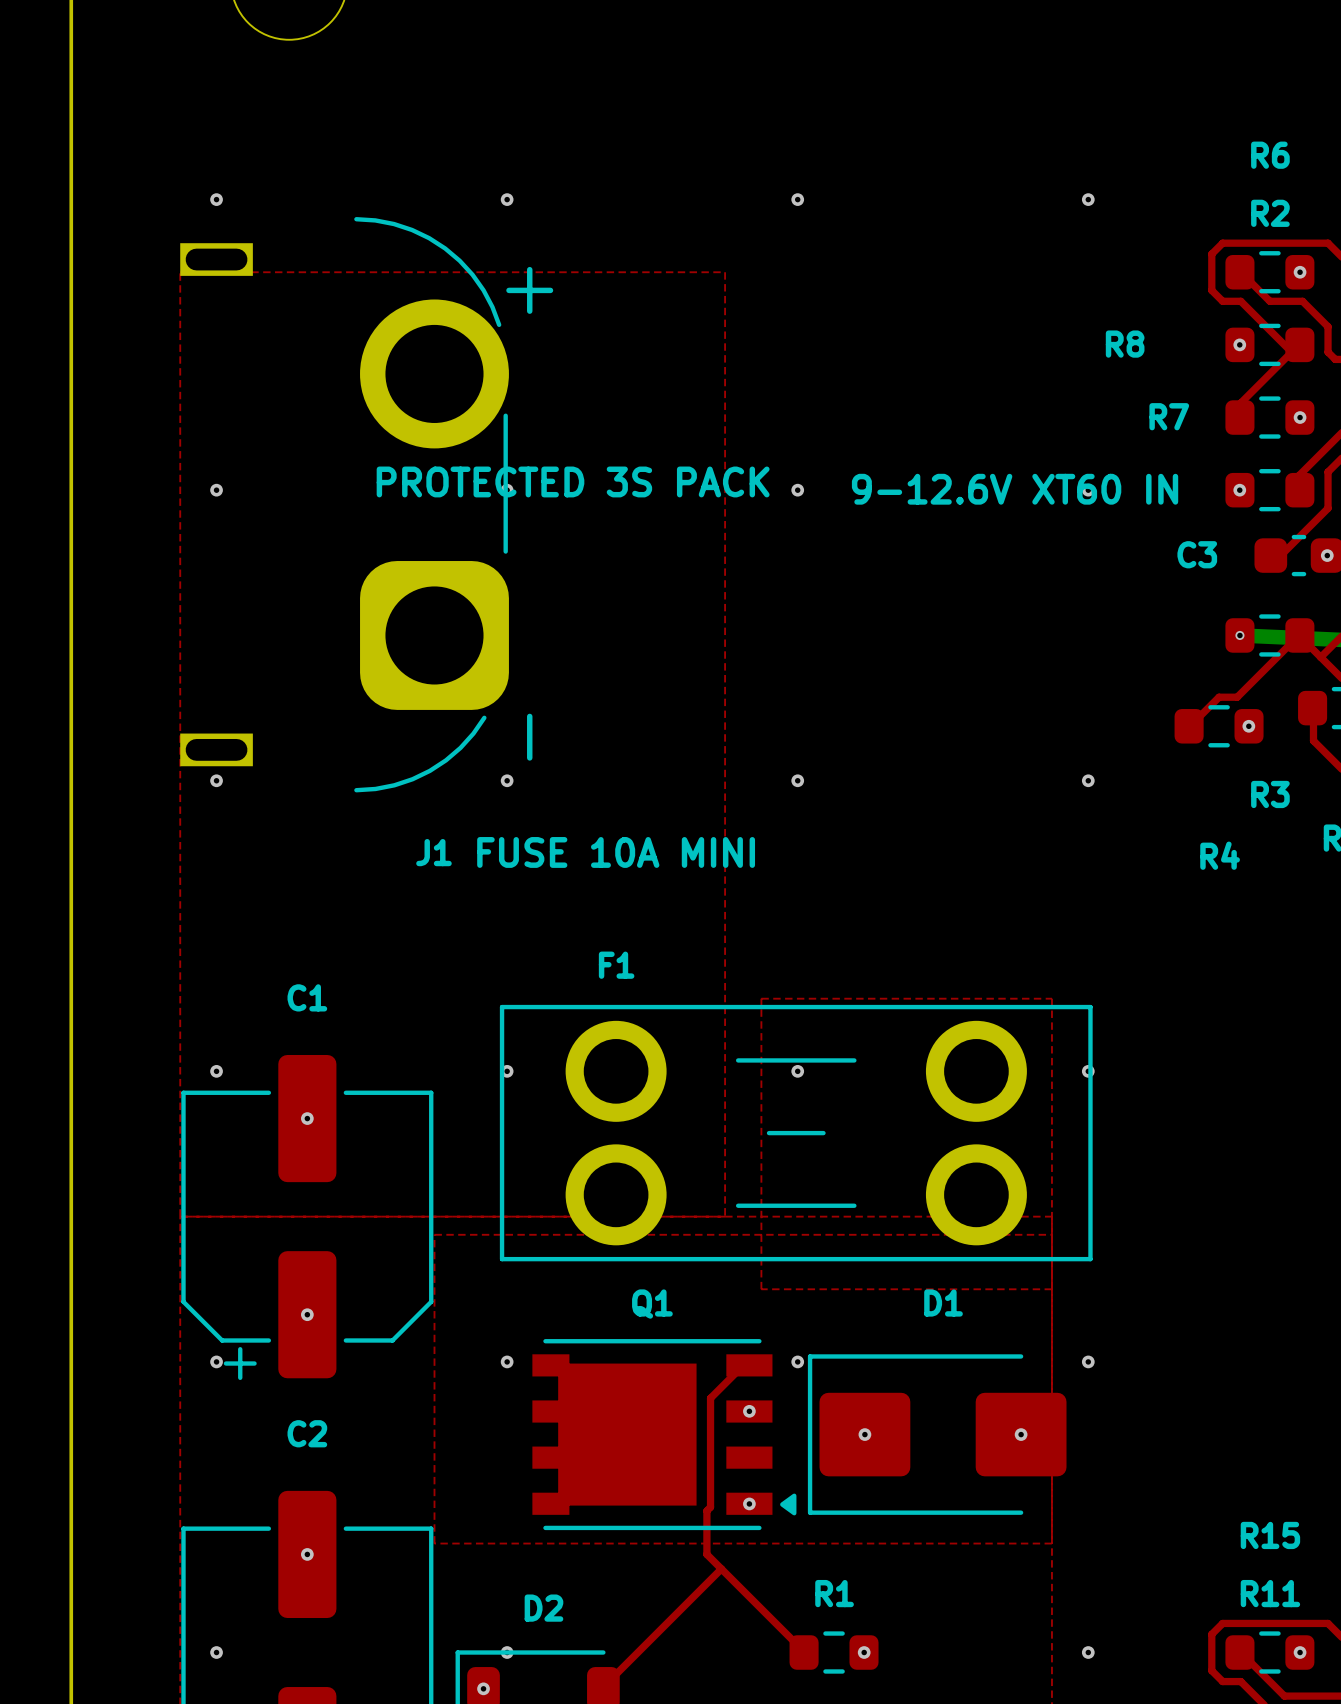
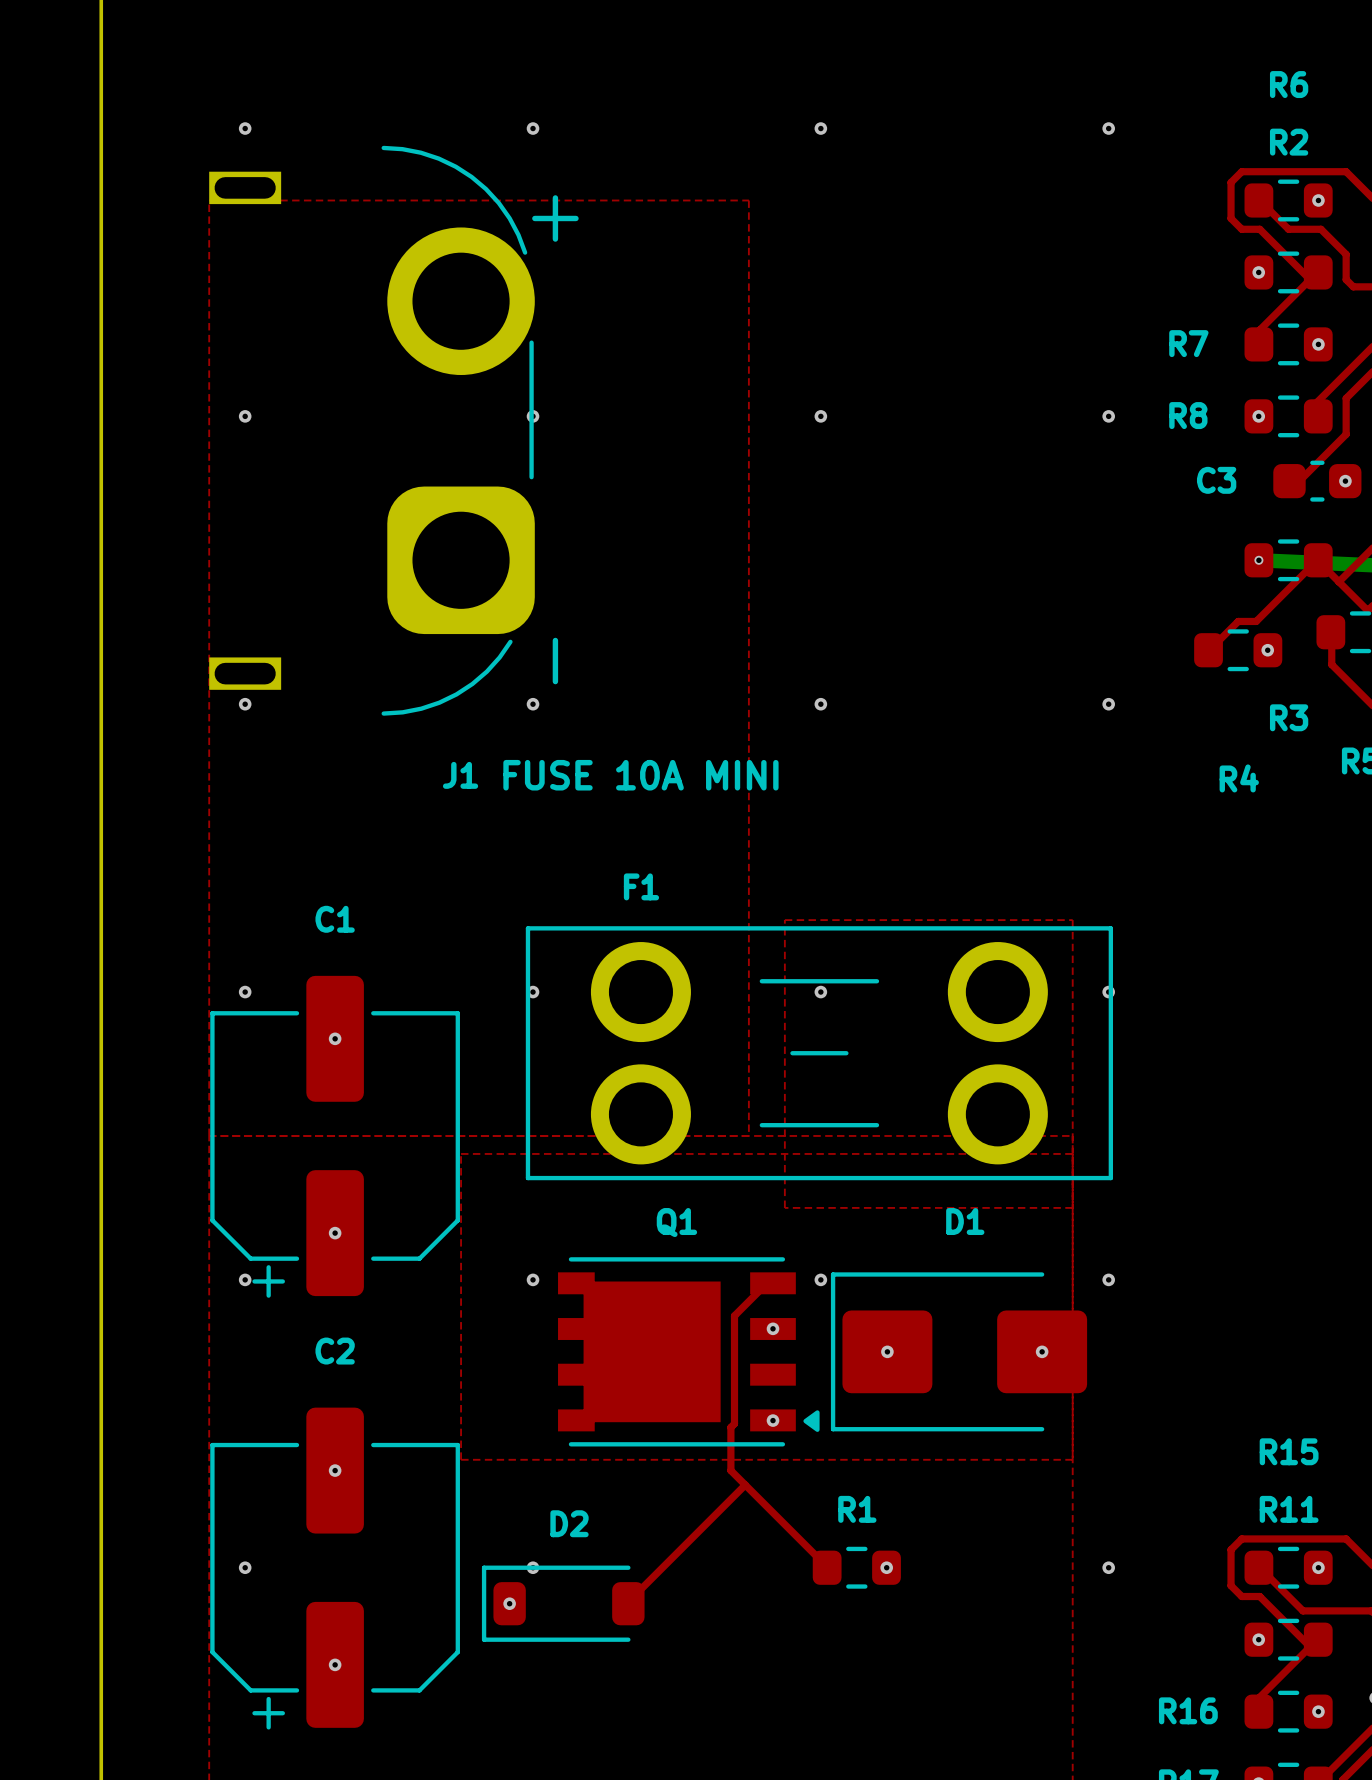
R8 name position: R8 (1125, 344) -> R8 (1188, 415)
text: PROTECTED 3S PACK (573, 481) -> none
text: 9-12.6V XT60 IN (1015, 489) -> none

